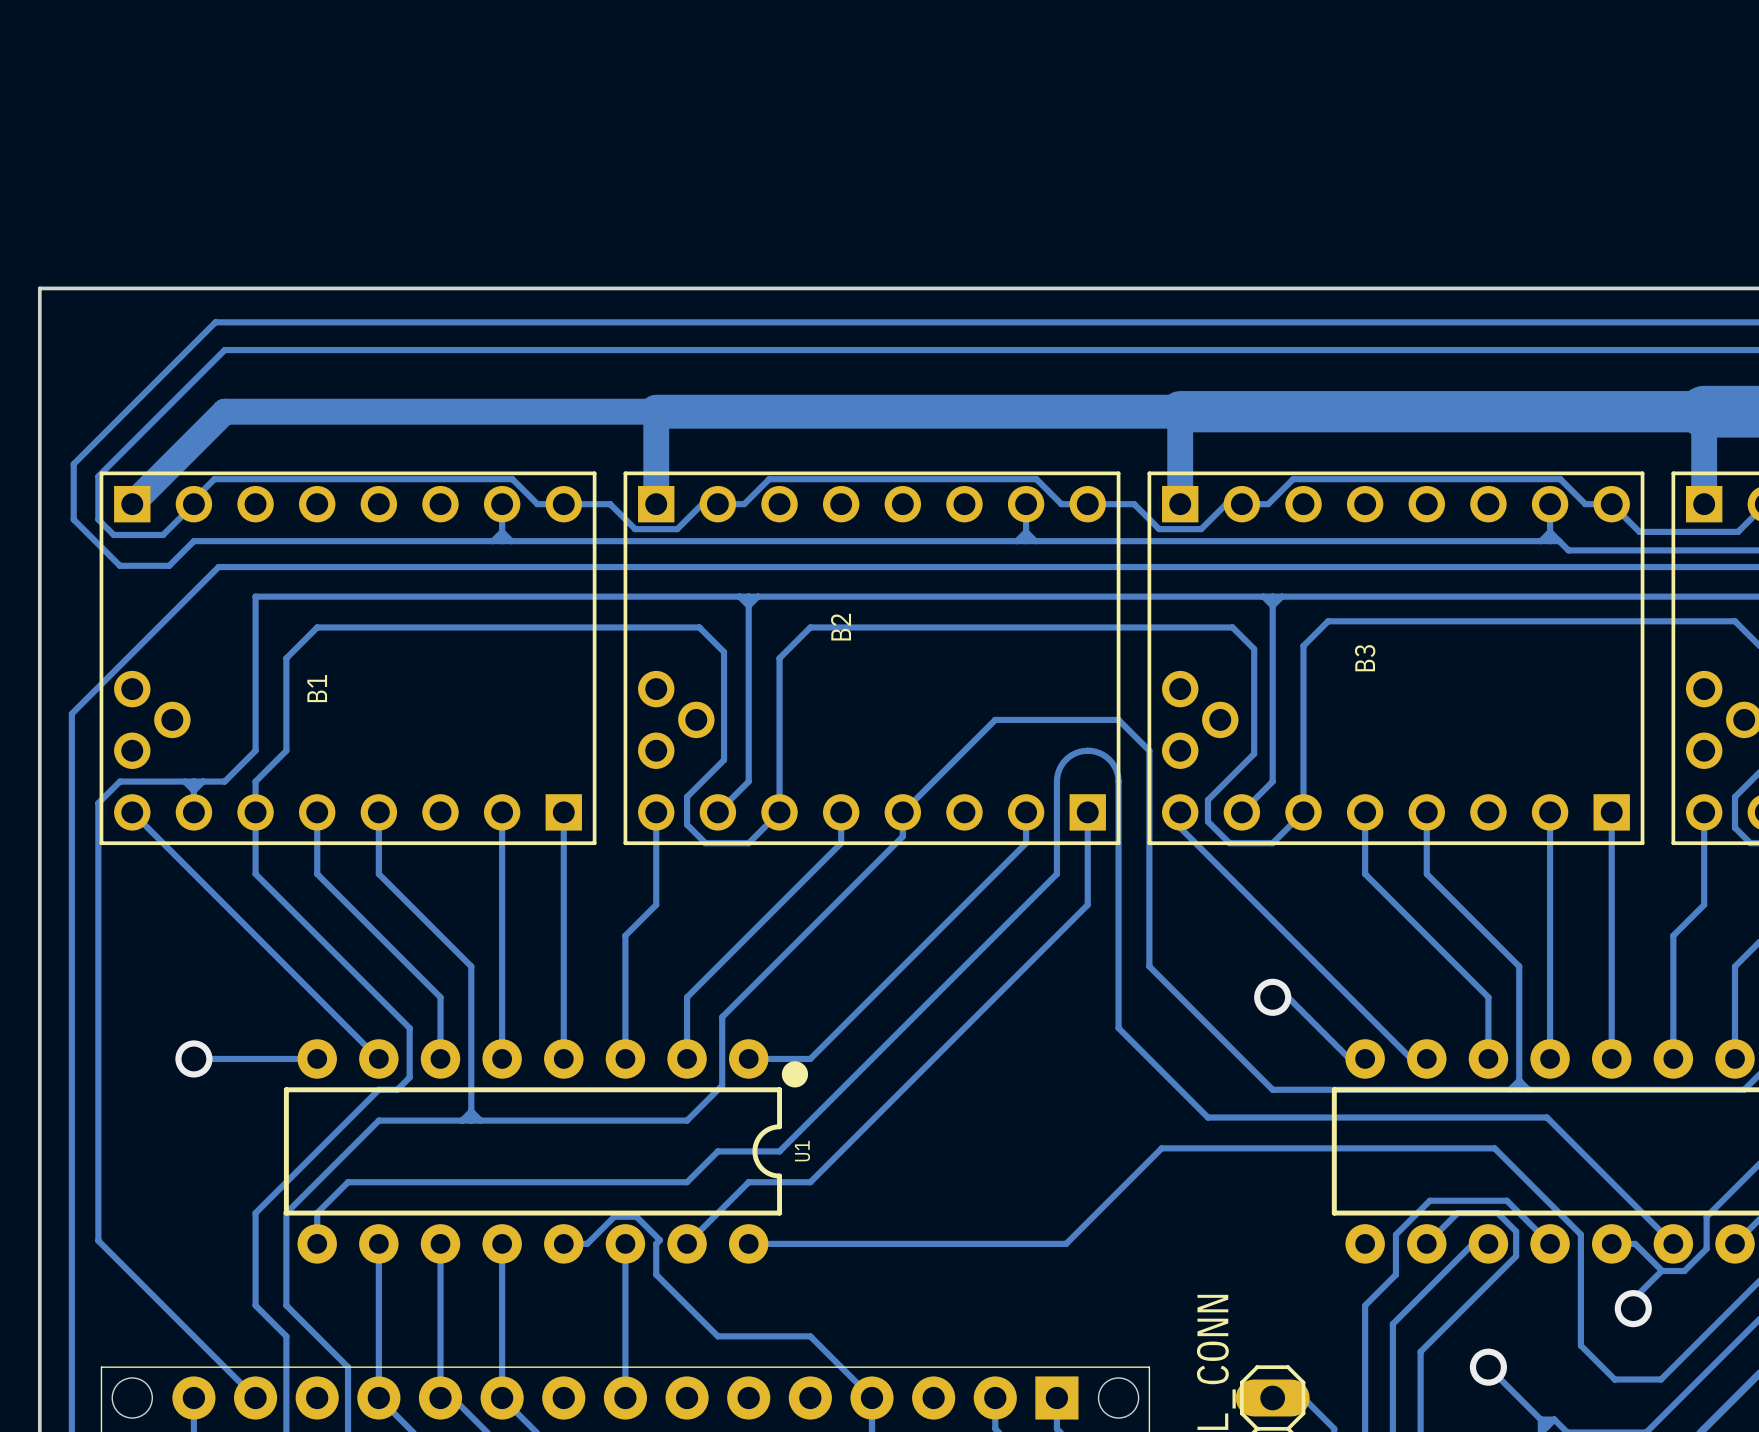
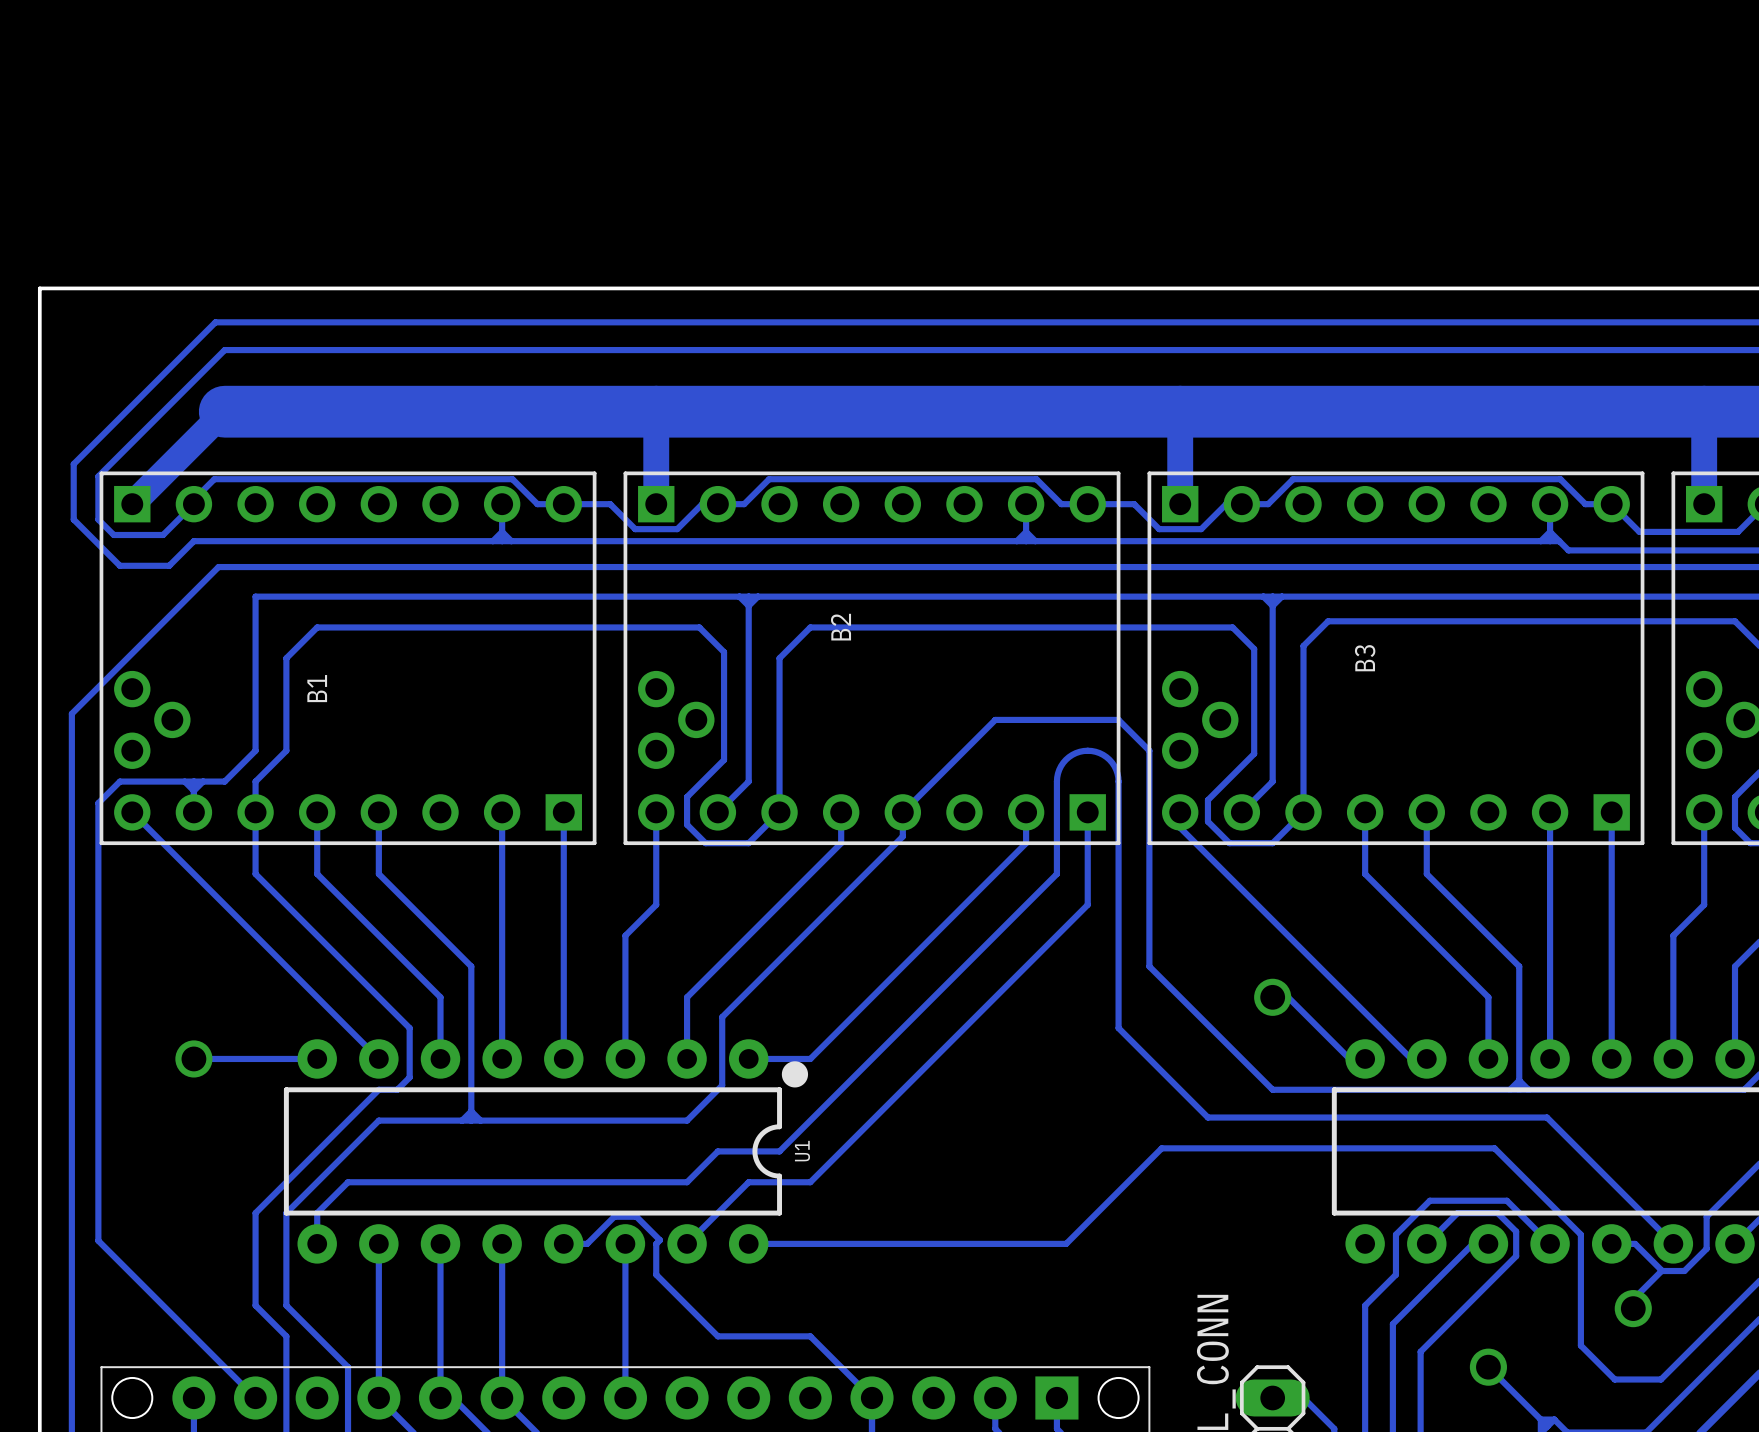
bottom track width: thin (224, 411) (1704, 411) -> thick (224, 411) (1704, 411)

